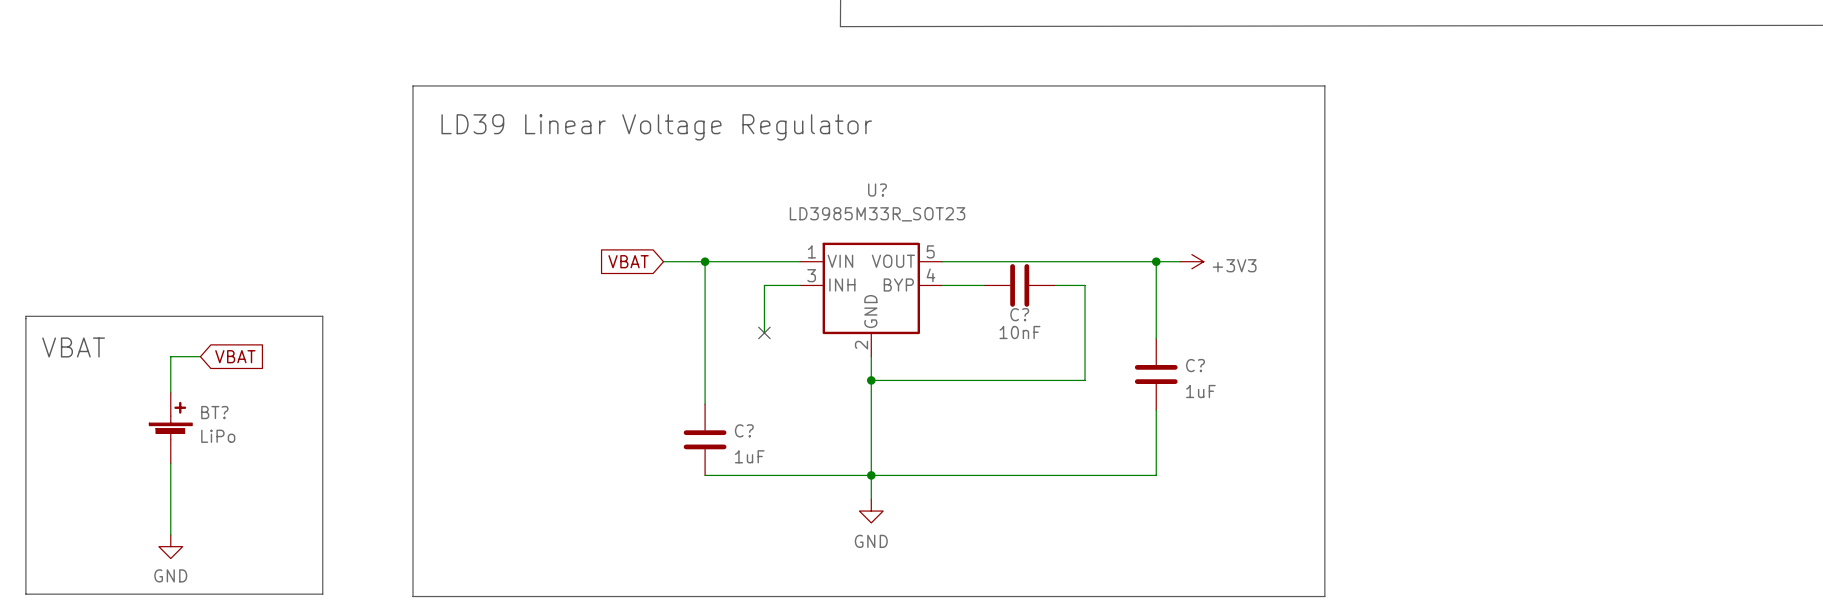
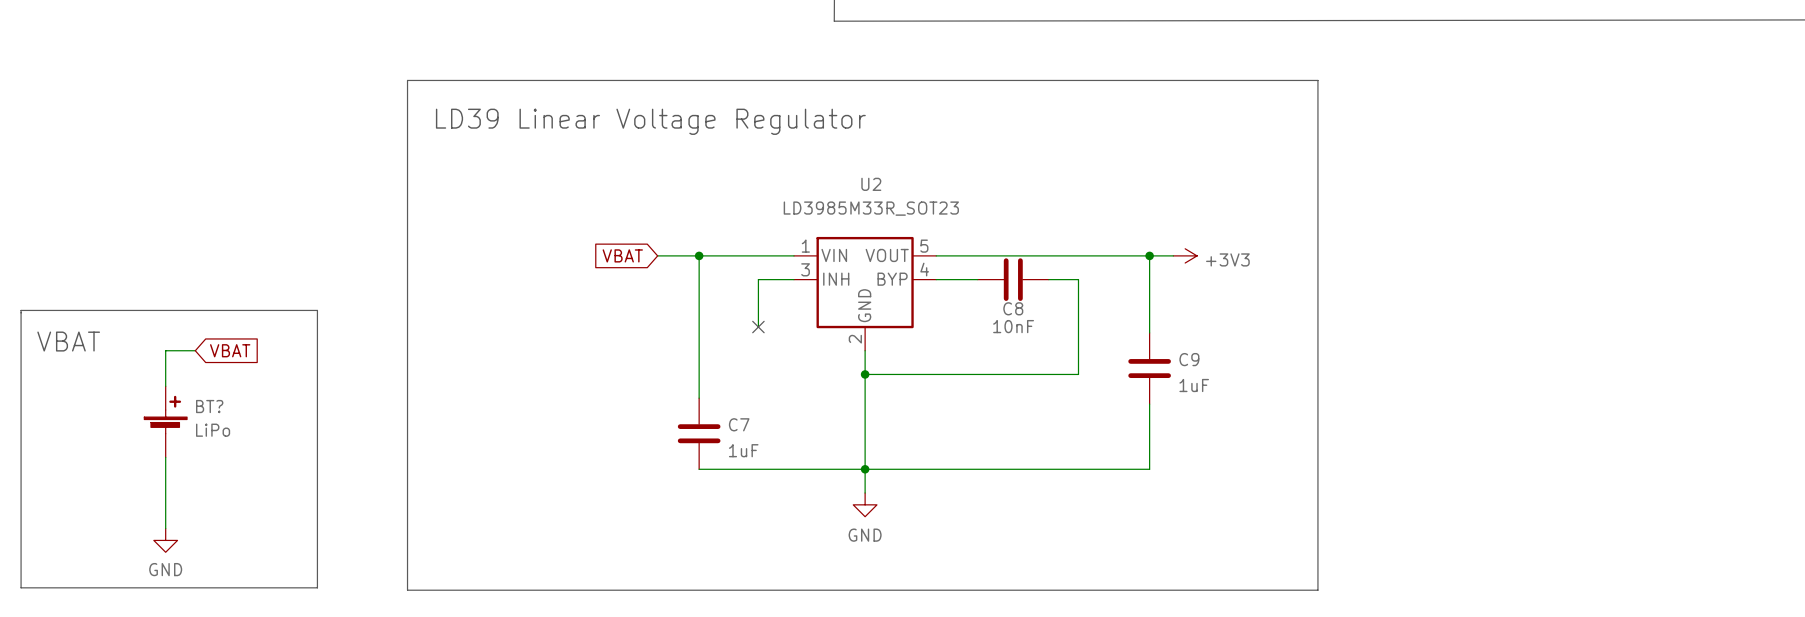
U? name: U? (877, 190) -> U2 (871, 184)
C? name: C? (1019, 314) -> C8 (1013, 308)
C? name: C? (1195, 365) -> C9 (1189, 359)
C? name: C? (744, 430) -> C7 (739, 424)

